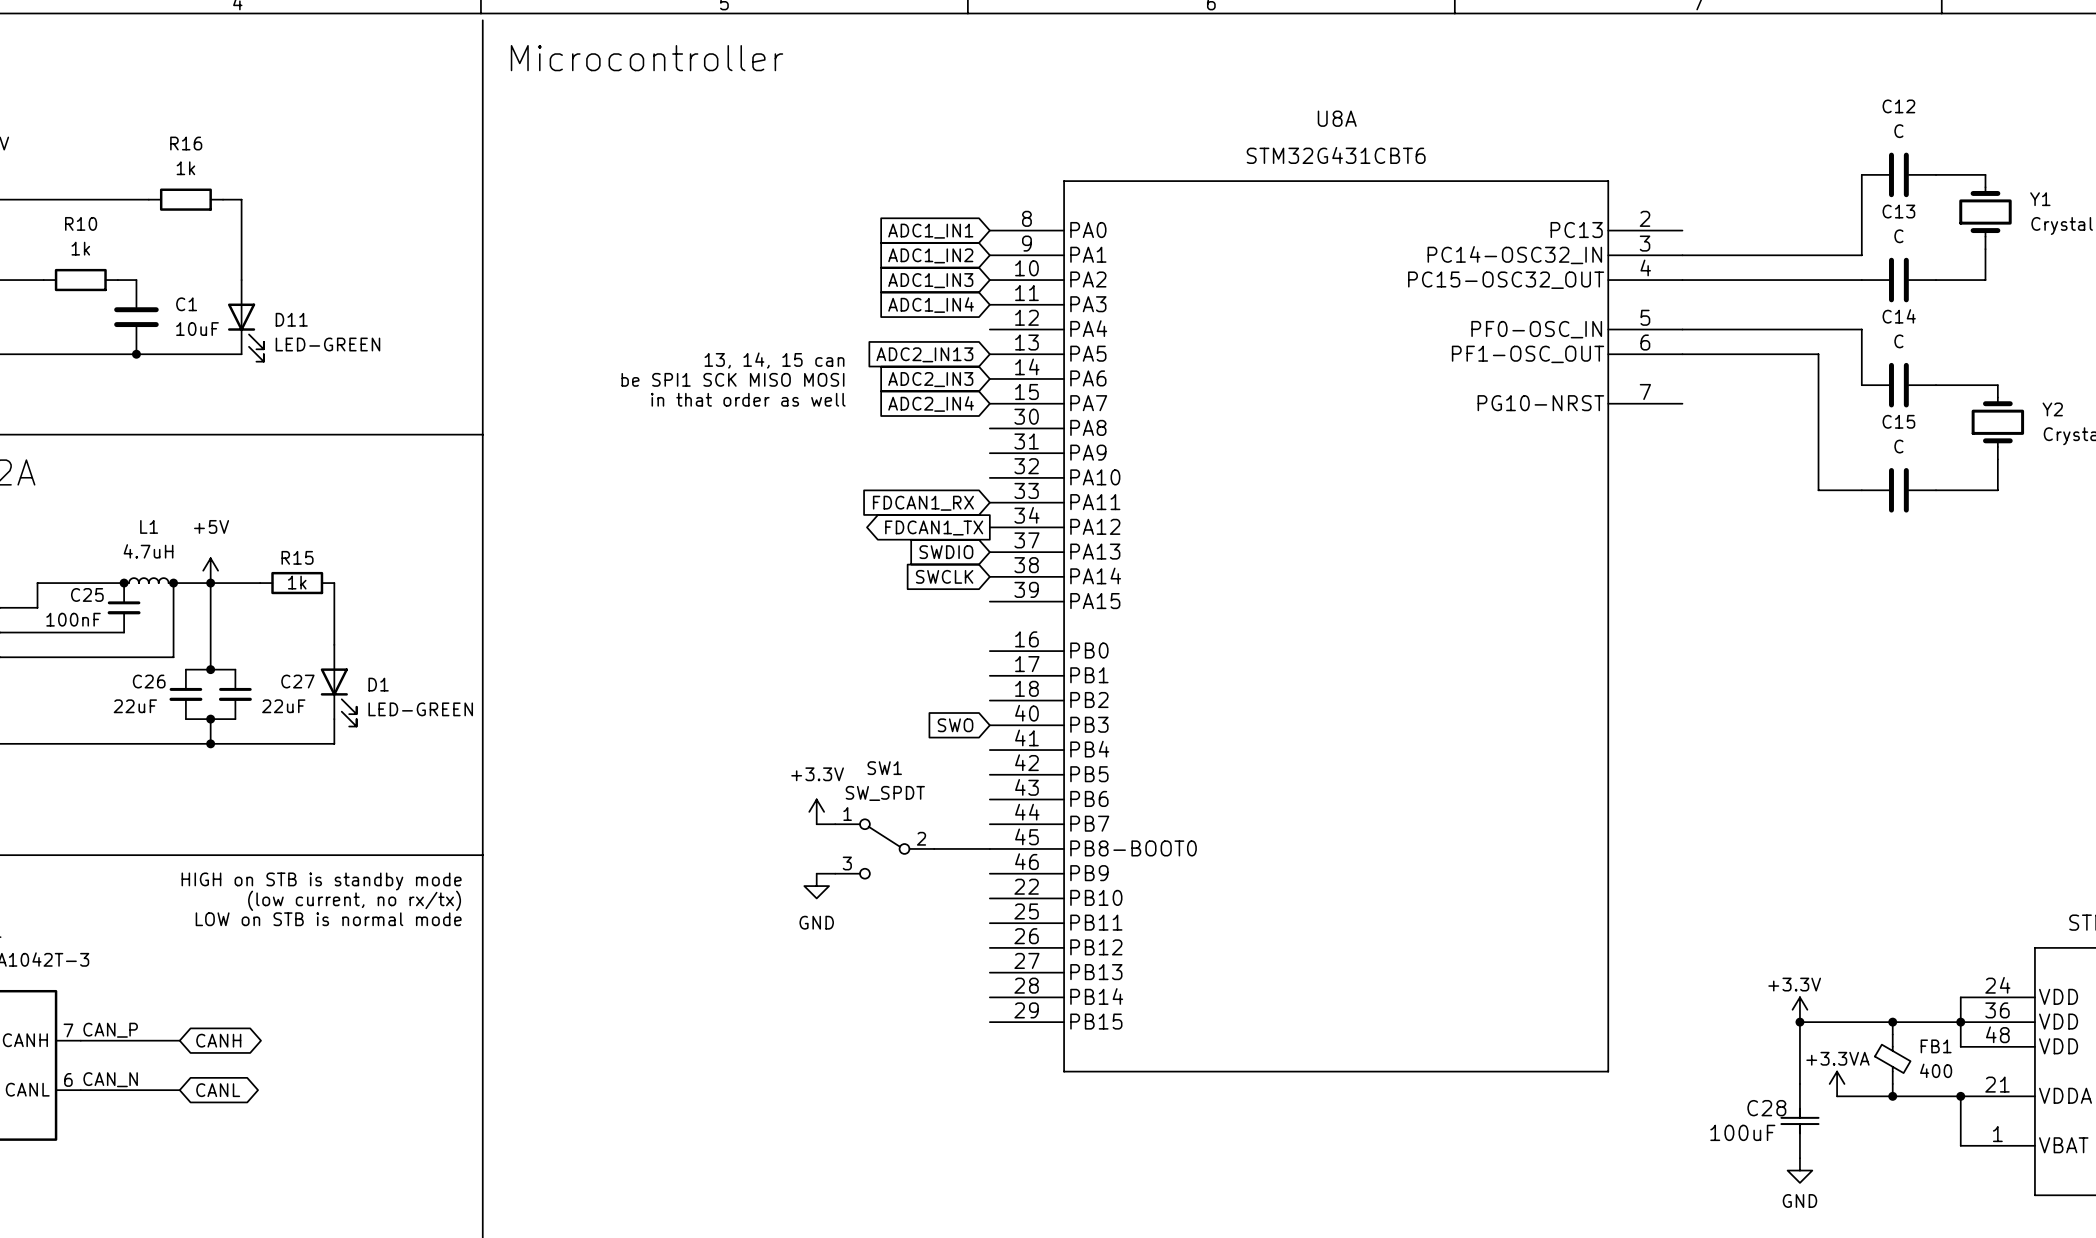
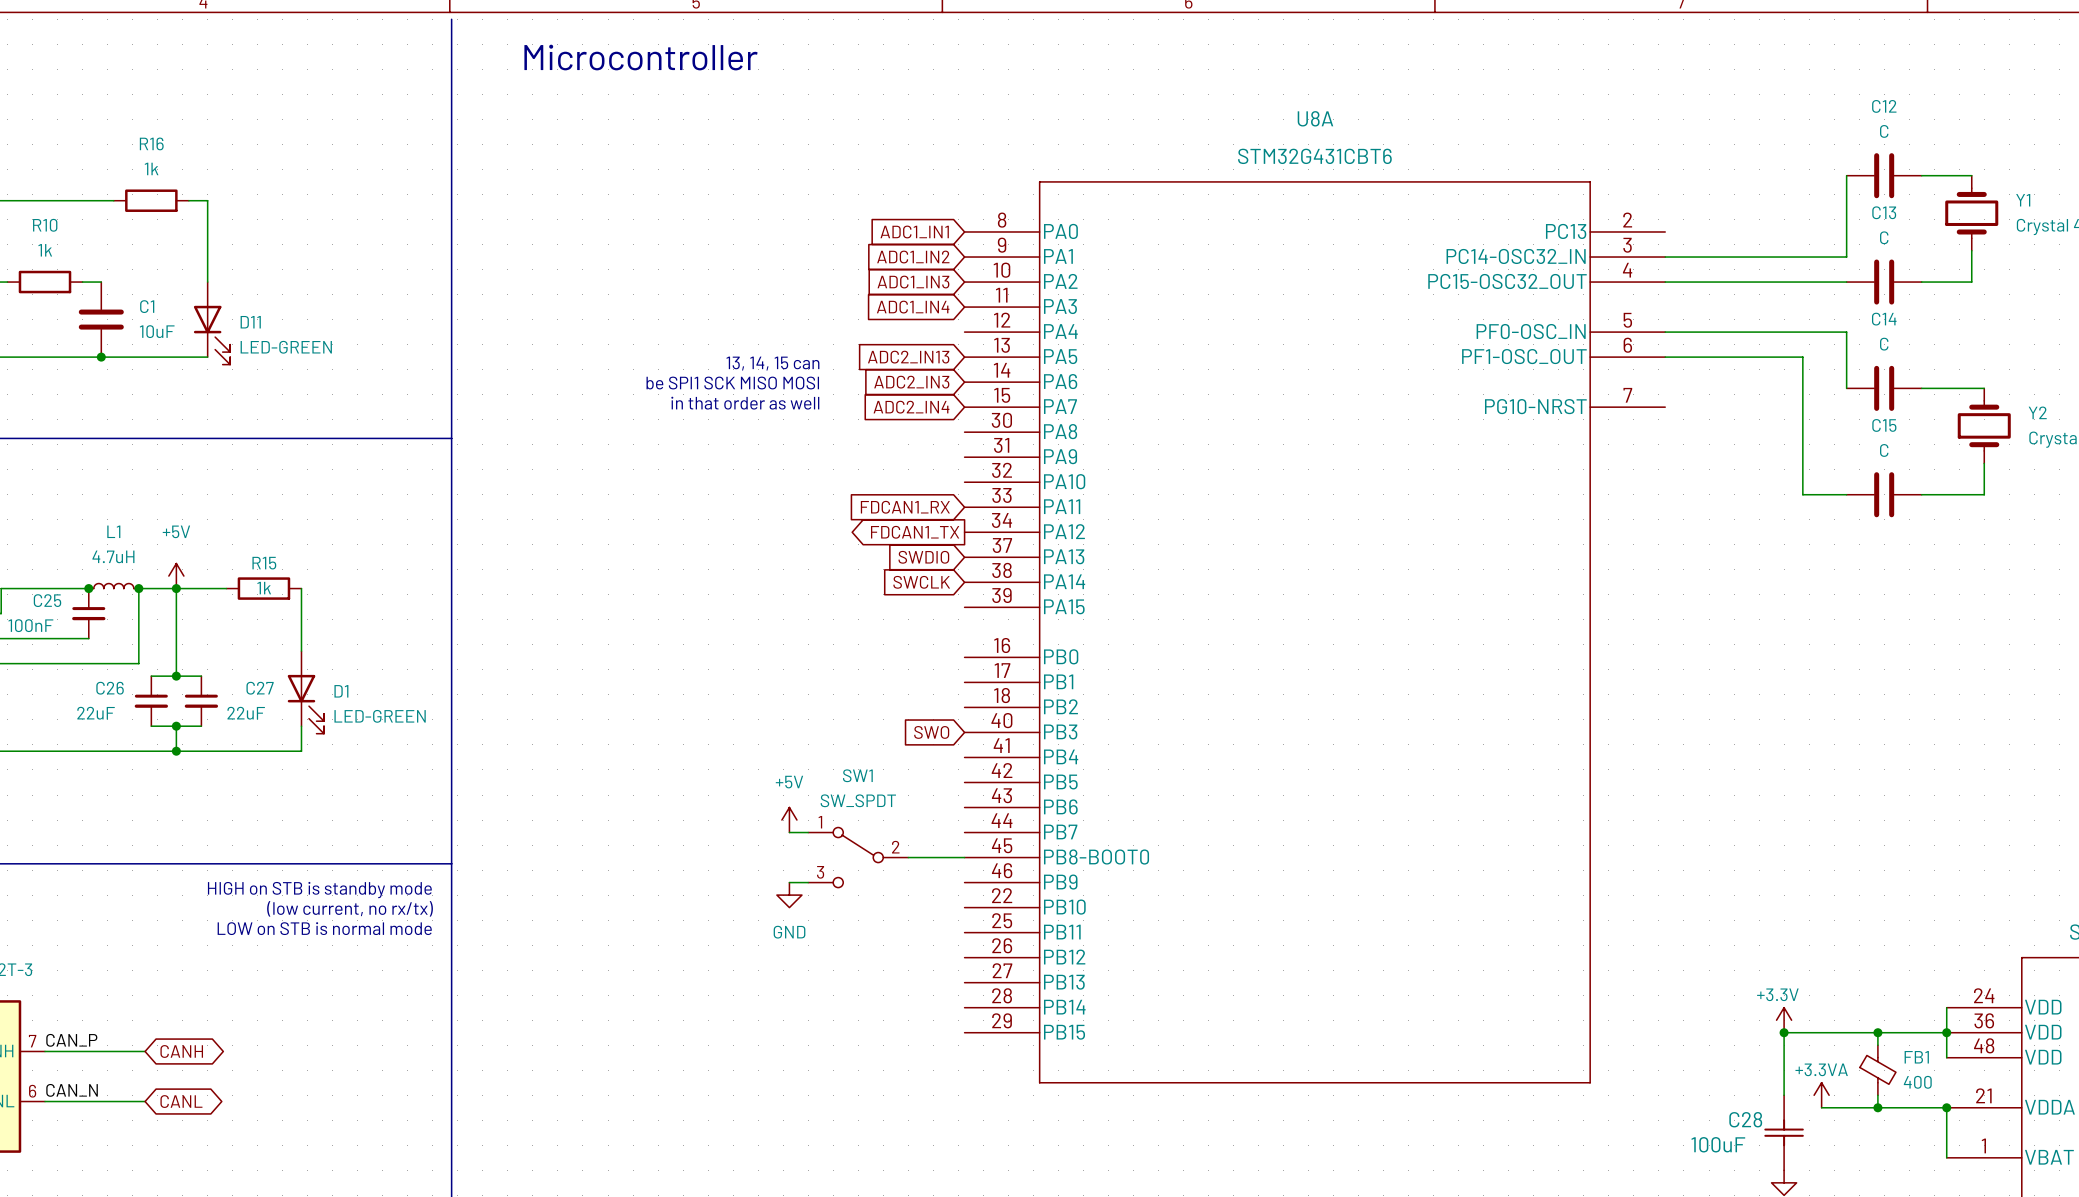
power symbol: +3.3V (816, 811) -> +5V (789, 820)

